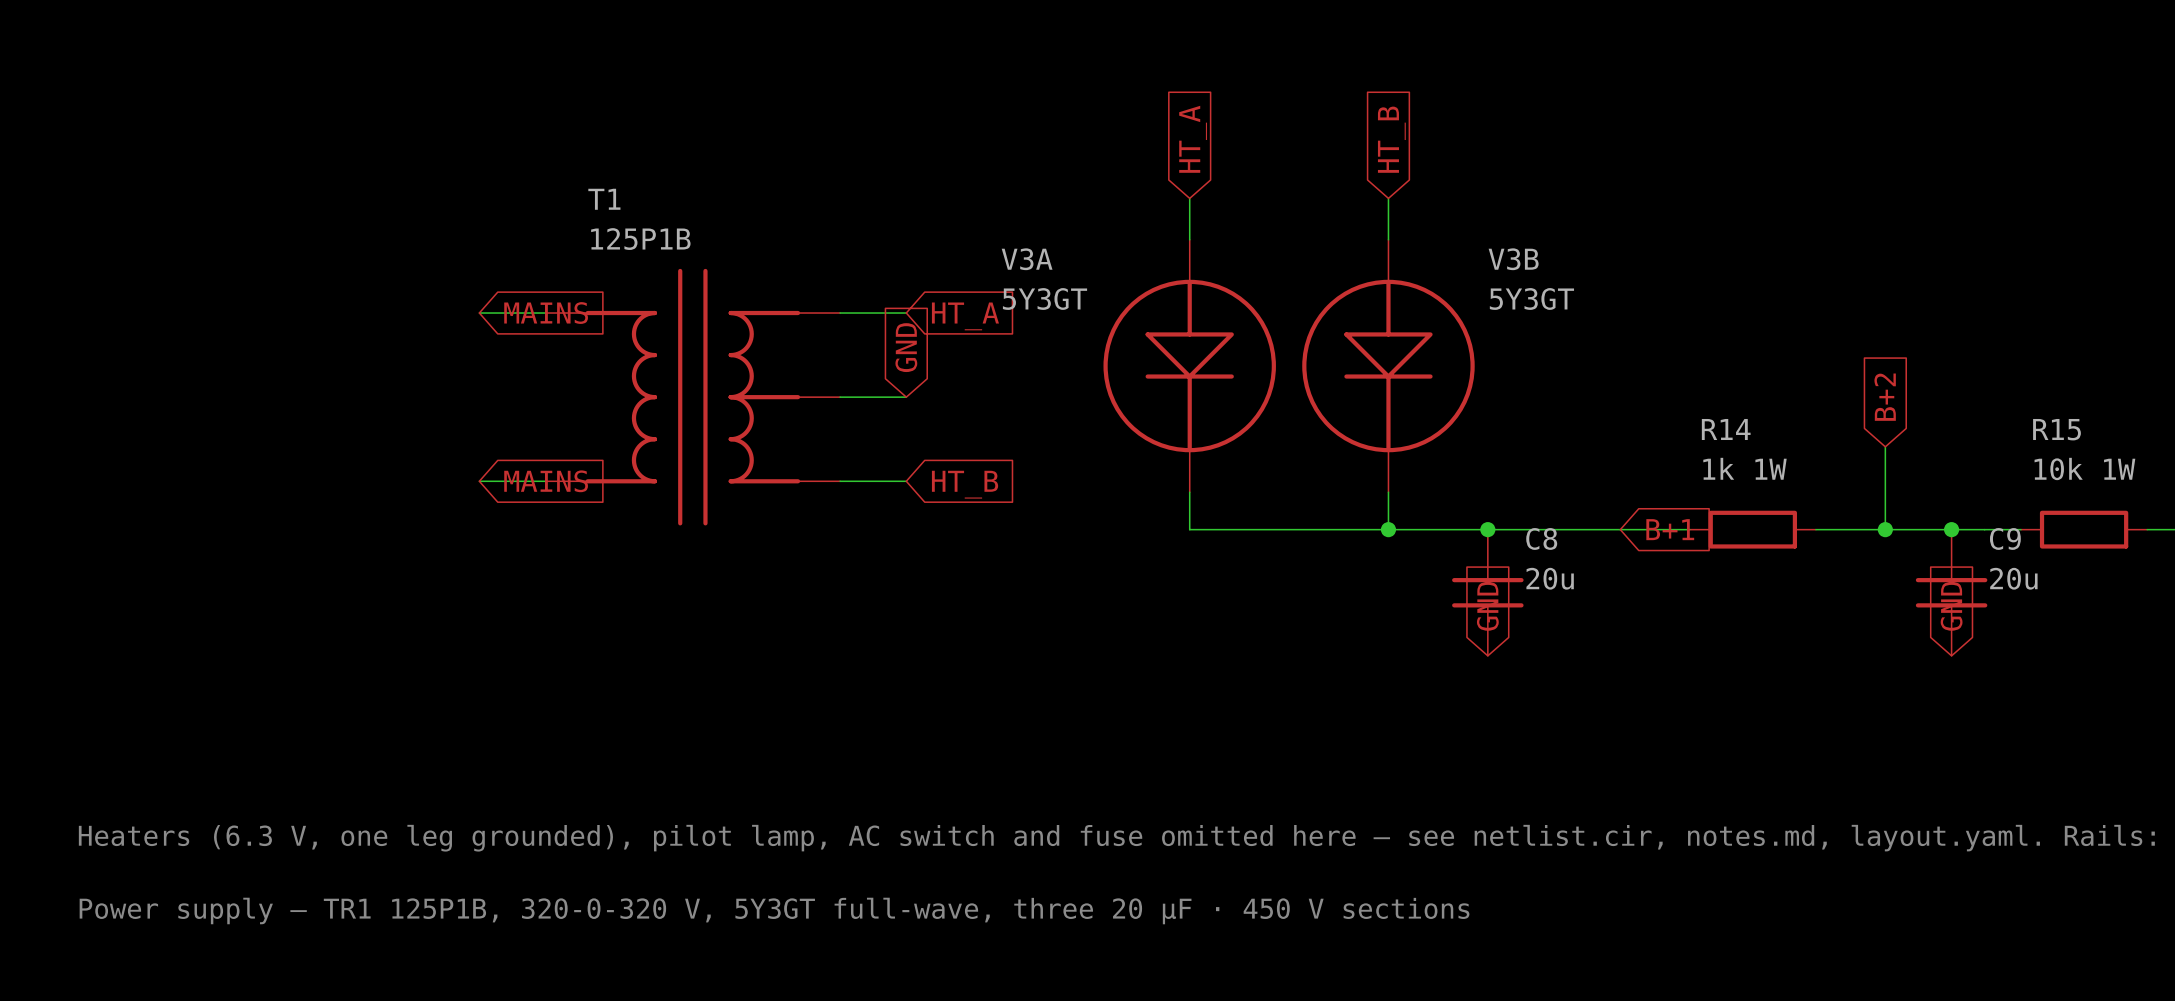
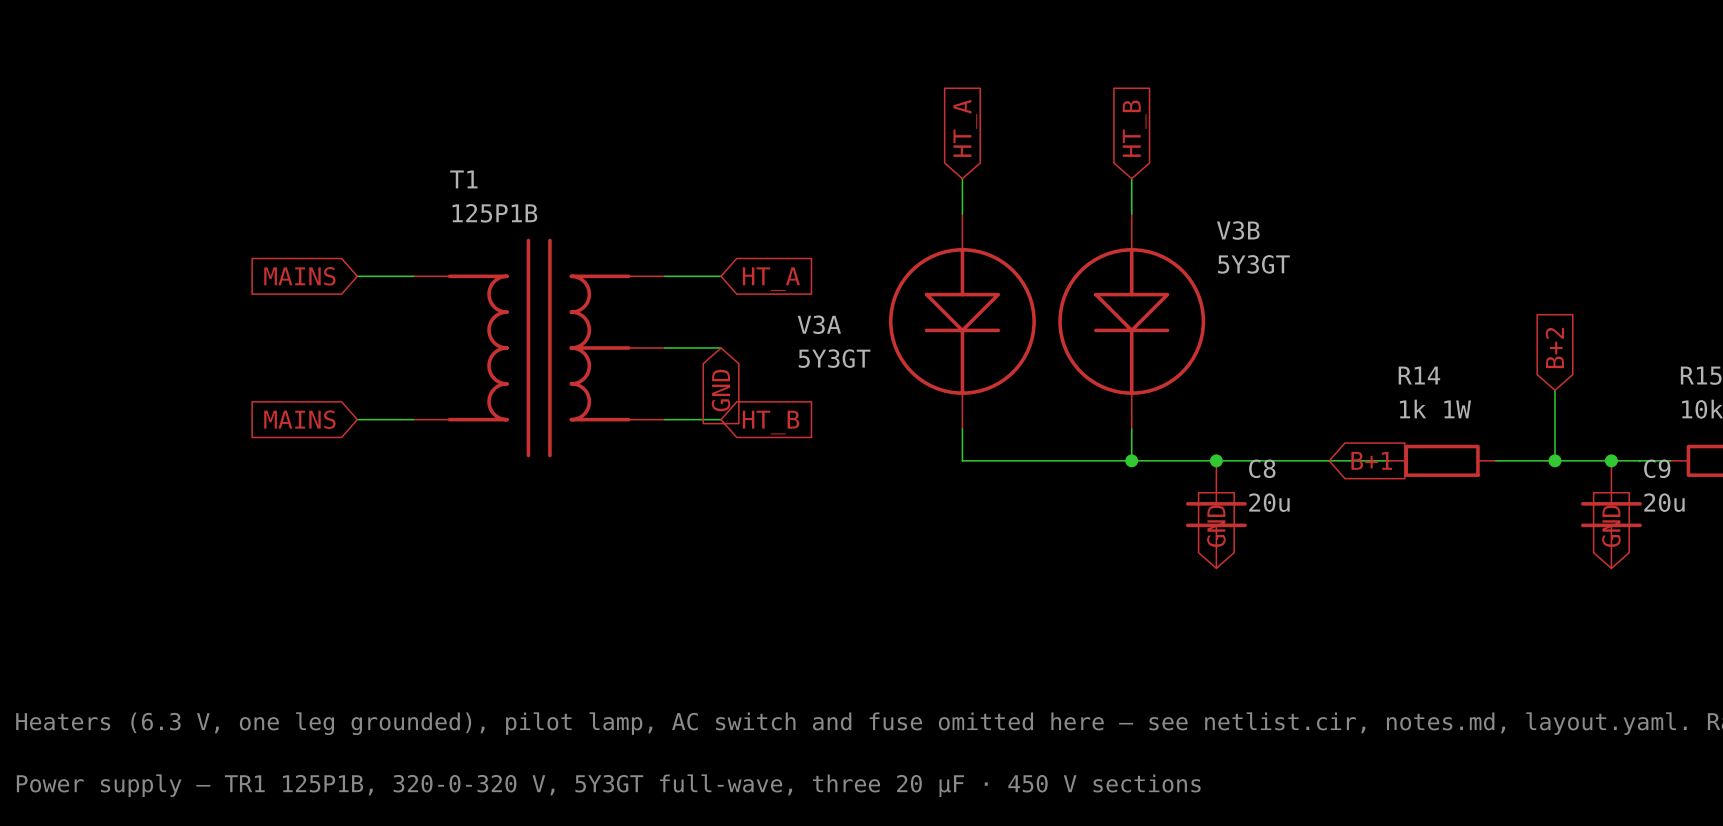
V3A name position: V3A (1027, 259) -> V3A (819, 324)
V3A value position: 5Y3GT (1045, 298) -> 5Y3GT (834, 358)
global label rotation: 0° (546, 313) -> 180° (299, 276)
global label rotation: 0° (906, 347) -> 180° (721, 390)
global label rotation: 0° (546, 481) -> 180° (299, 419)

